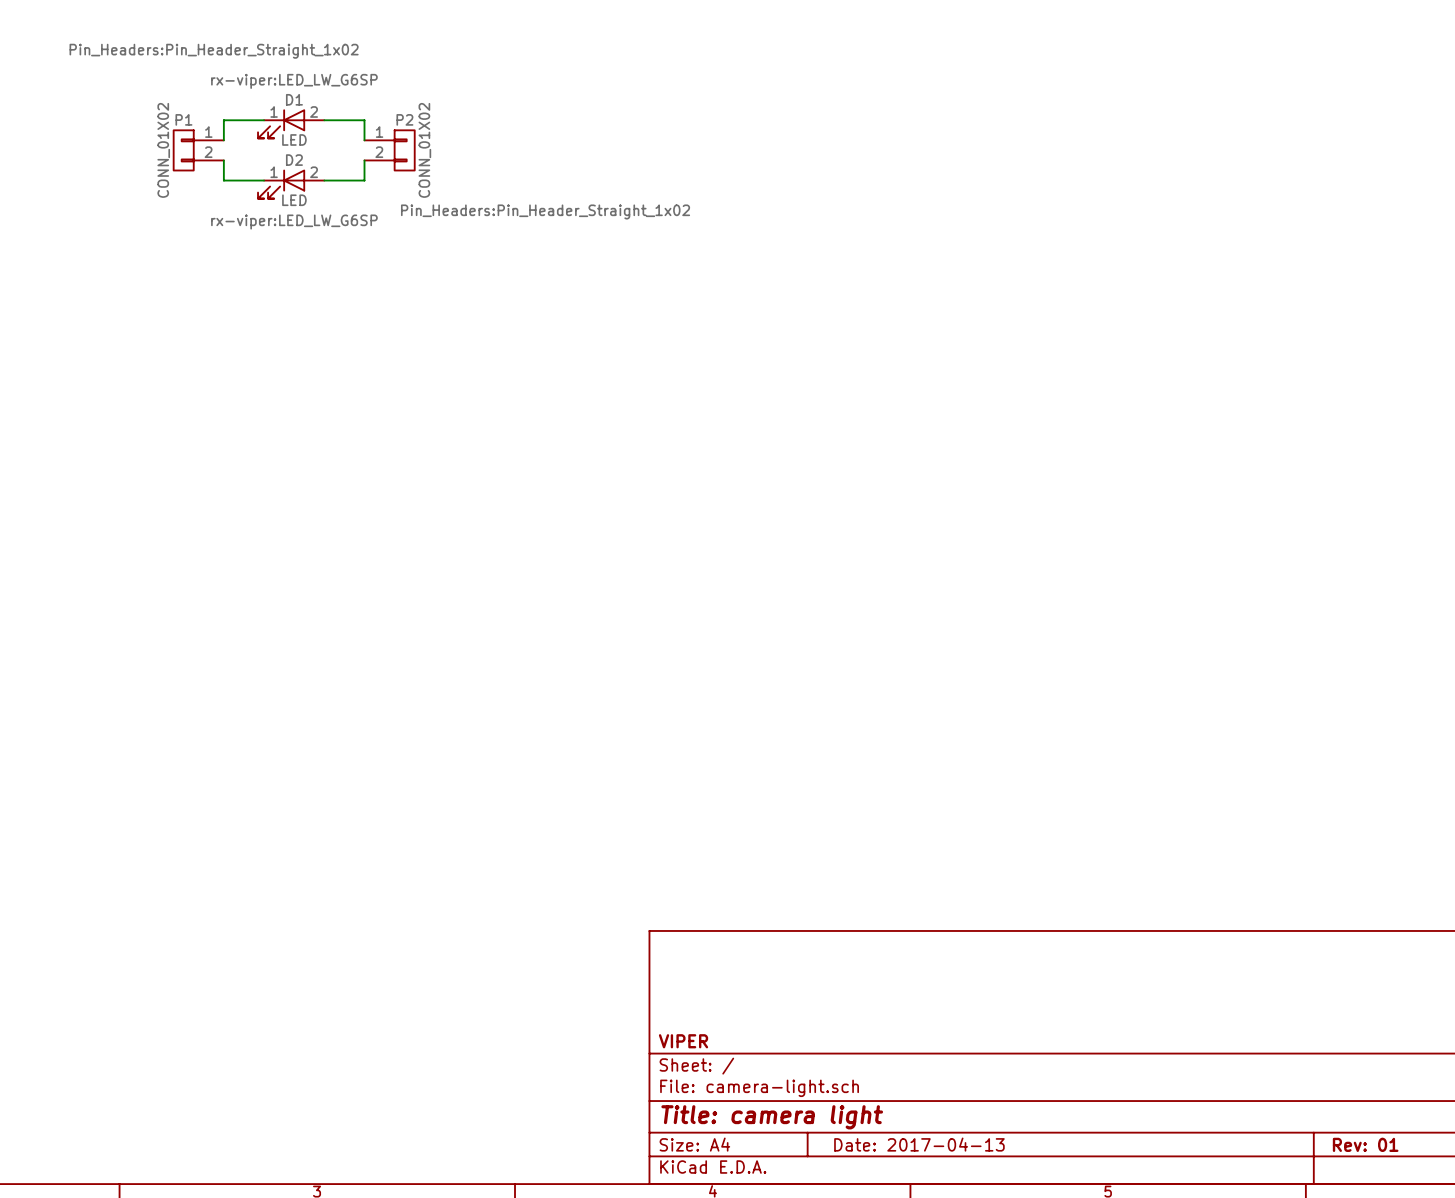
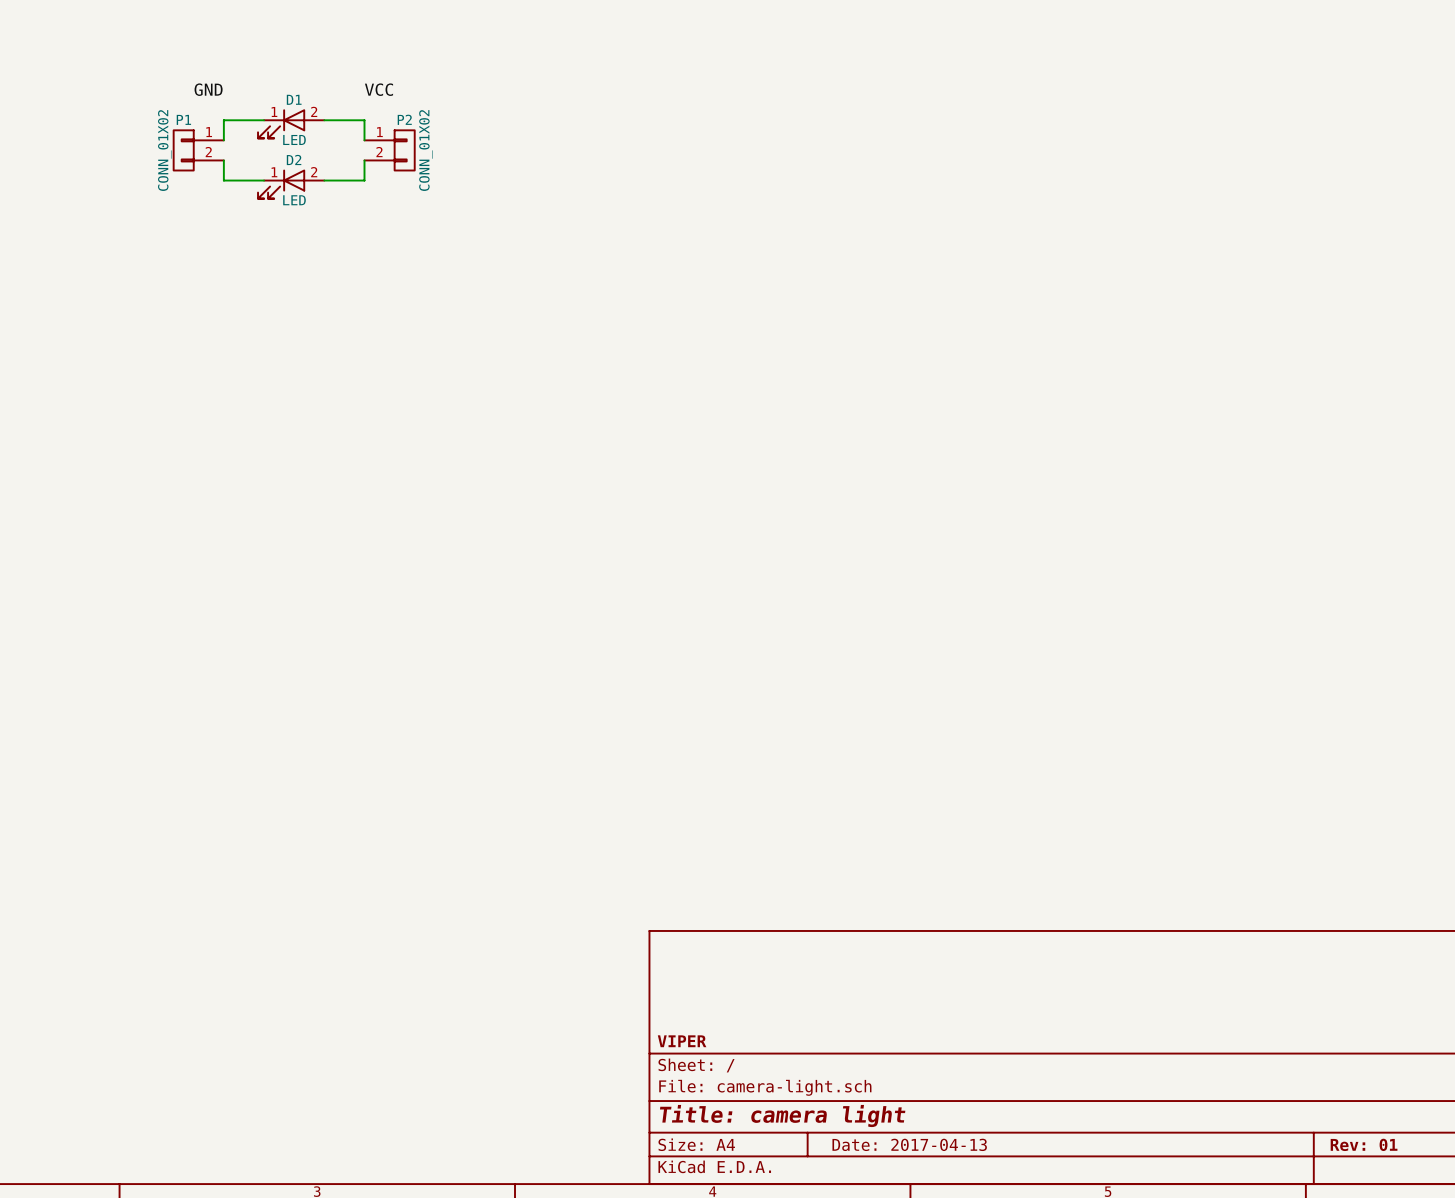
P1 text: Pin_Headers:Pin_Header_Straight_1x02 (214, 51) -> none
D1 text: rx-viper:LED_LW_G6SP (294, 81) -> none
label: none -> GND (208, 89)
label: none -> VCC (379, 89)
P2 text: Pin_Headers:Pin_Header_Straight_1x02 (545, 211) -> none
D2 text: rx-viper:LED_LW_G6SP (294, 222) -> none

